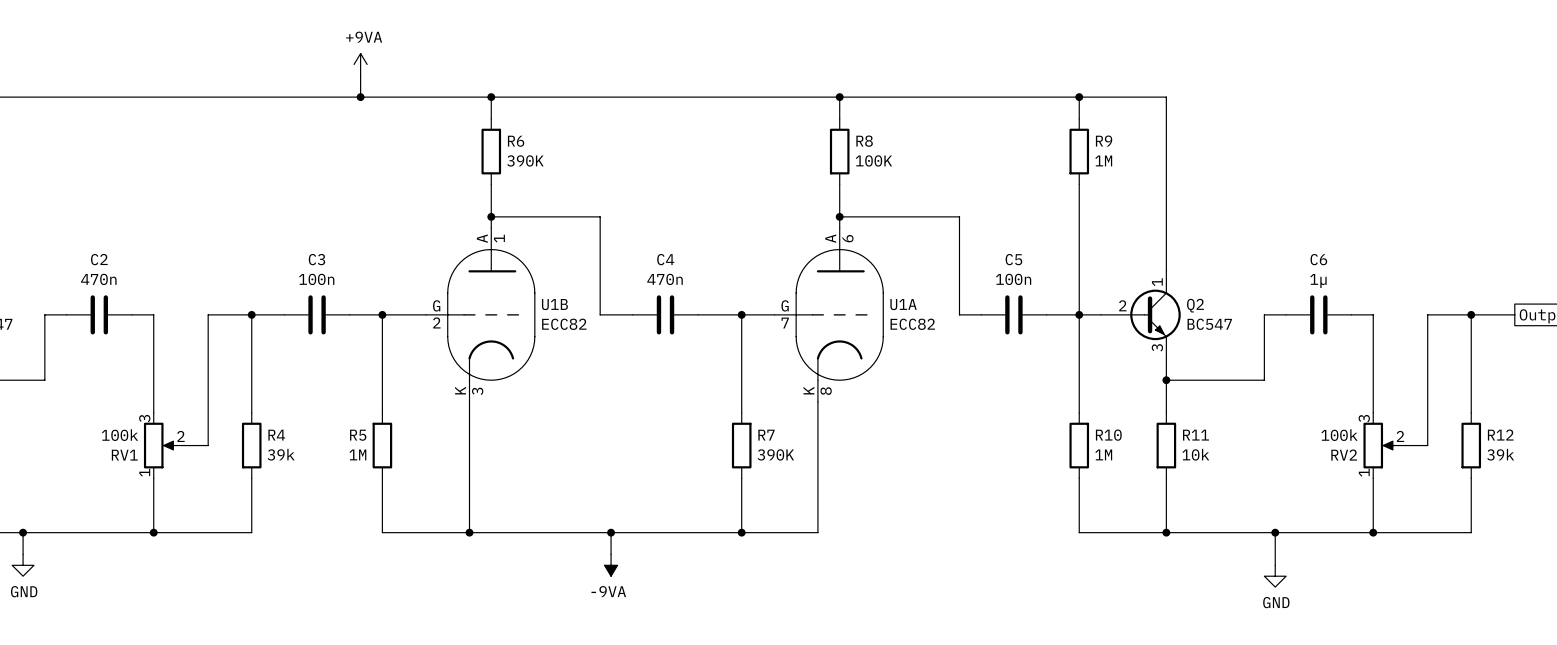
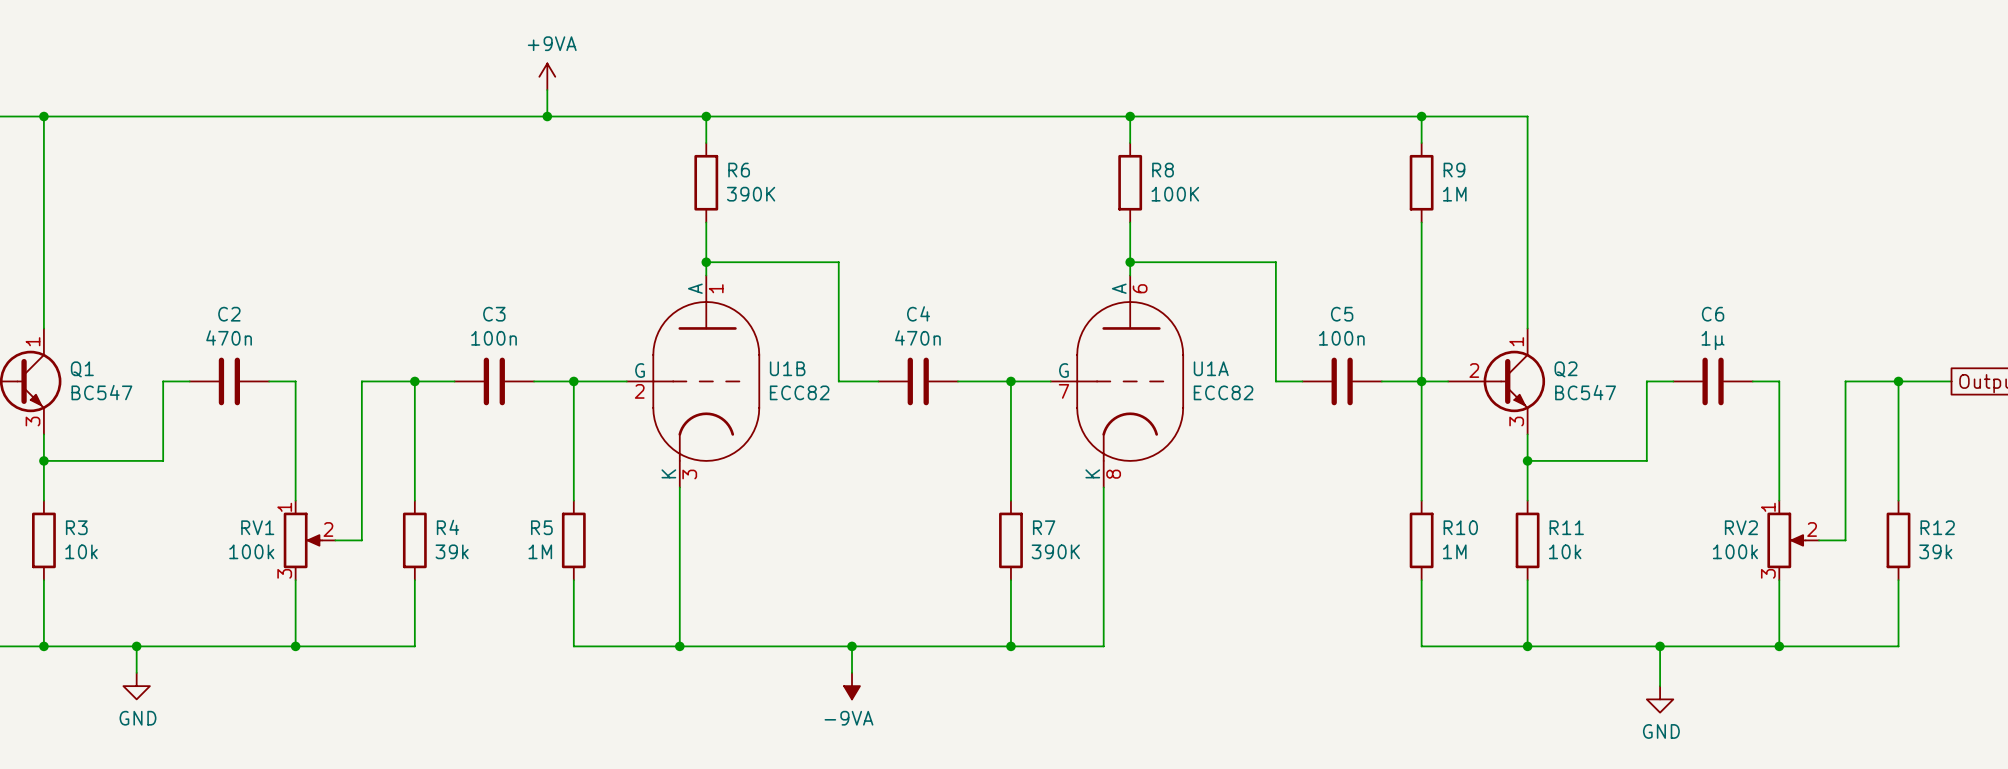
RV1 flip: as is (159, 445) -> up-down (302, 540)
RV2 flip: as is (1379, 445) -> up-down (1786, 540)

